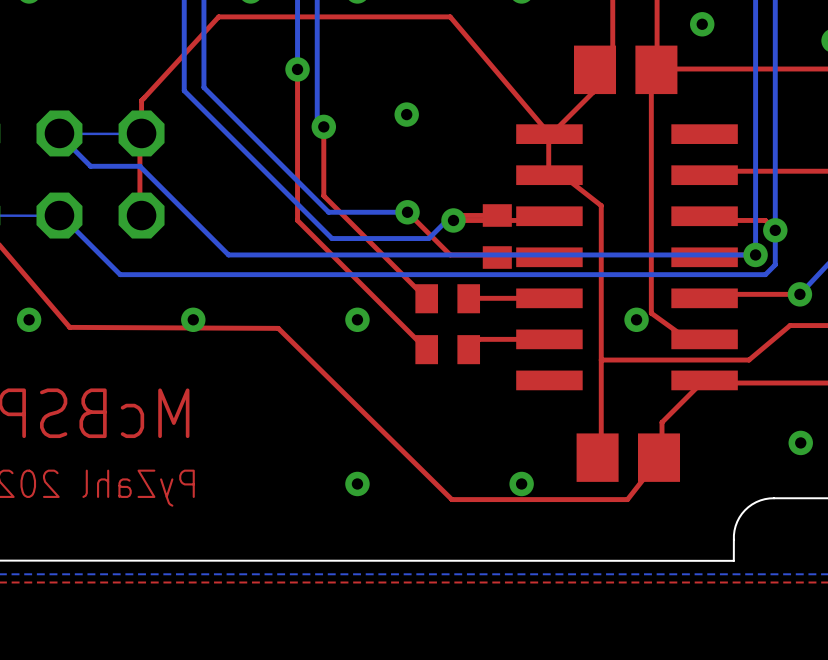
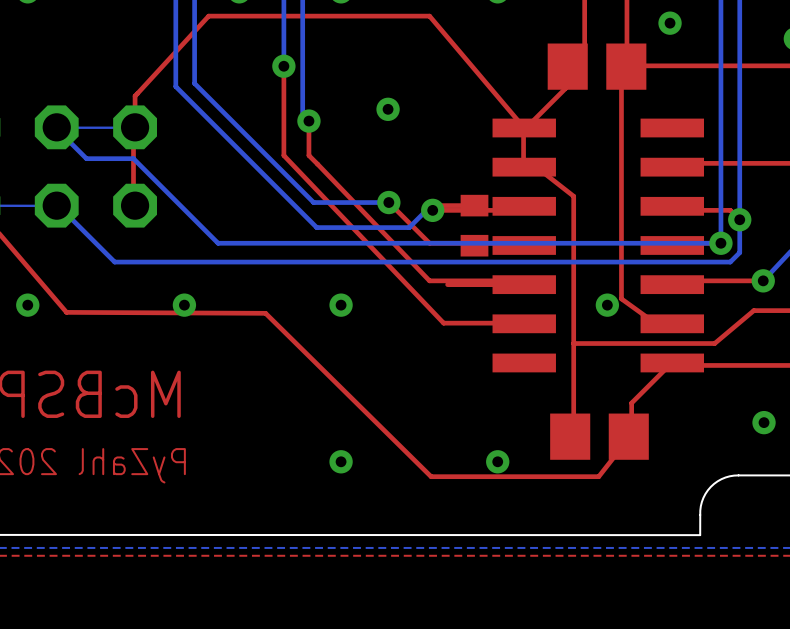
top track: (297, 163) (297, 220) (426, 349) -> (283, 155) (443, 323) (524, 323)
top track: (323, 163) (323, 195) (426, 298) -> (308, 155) (429, 280) (523, 280) (524, 284)
part: (447, 298) -> none
top track: (549, 339) (478, 339) (468, 349) -> none
part: (447, 349) -> none

